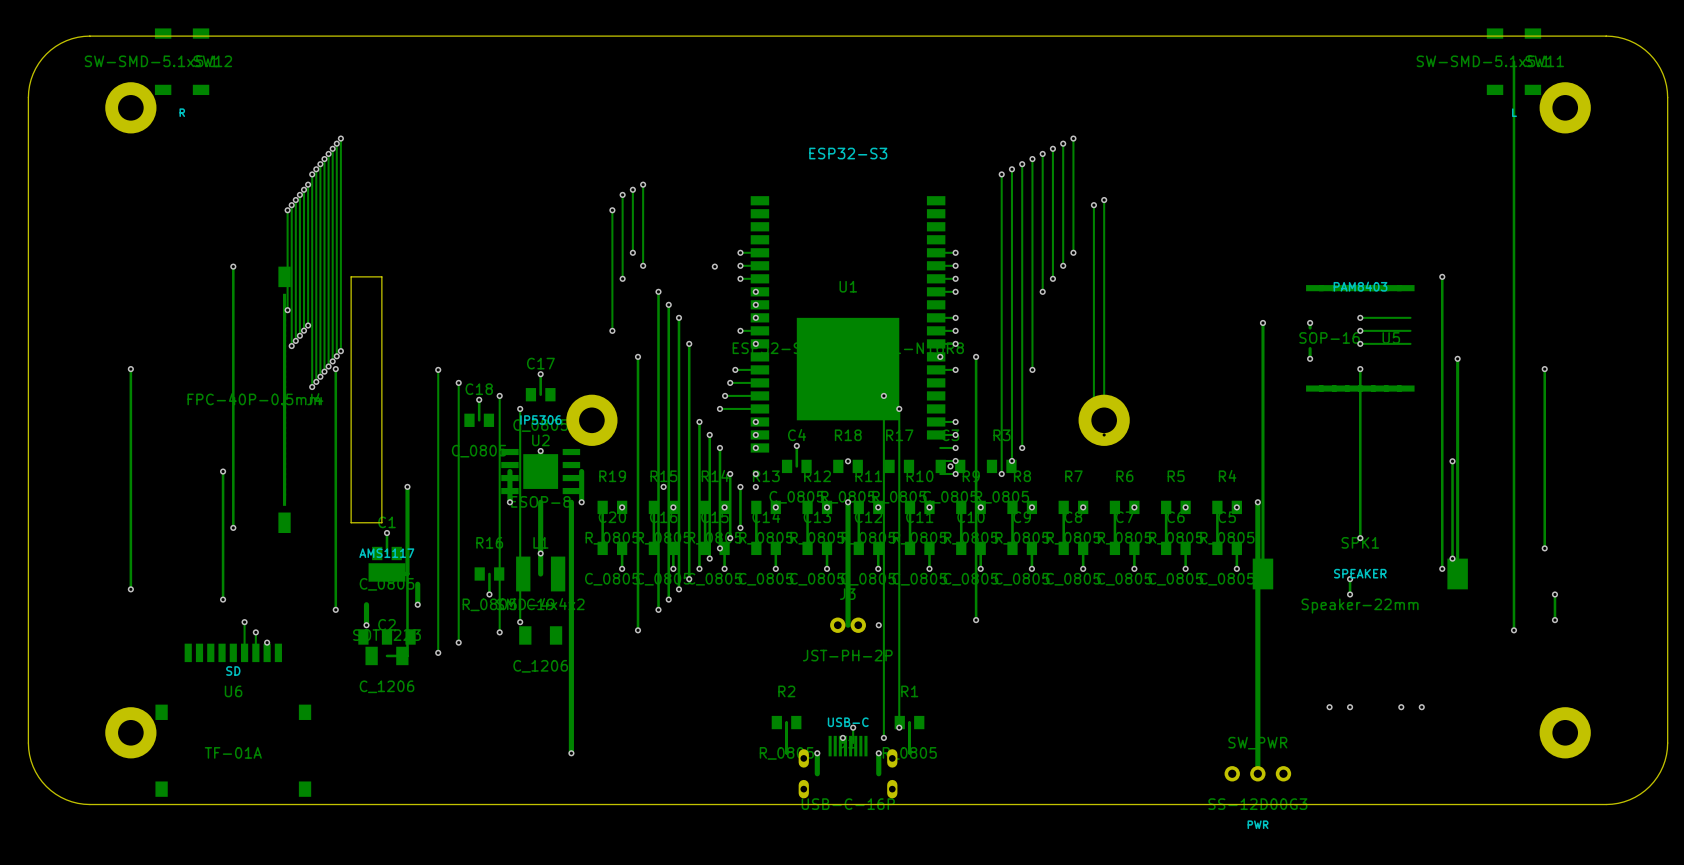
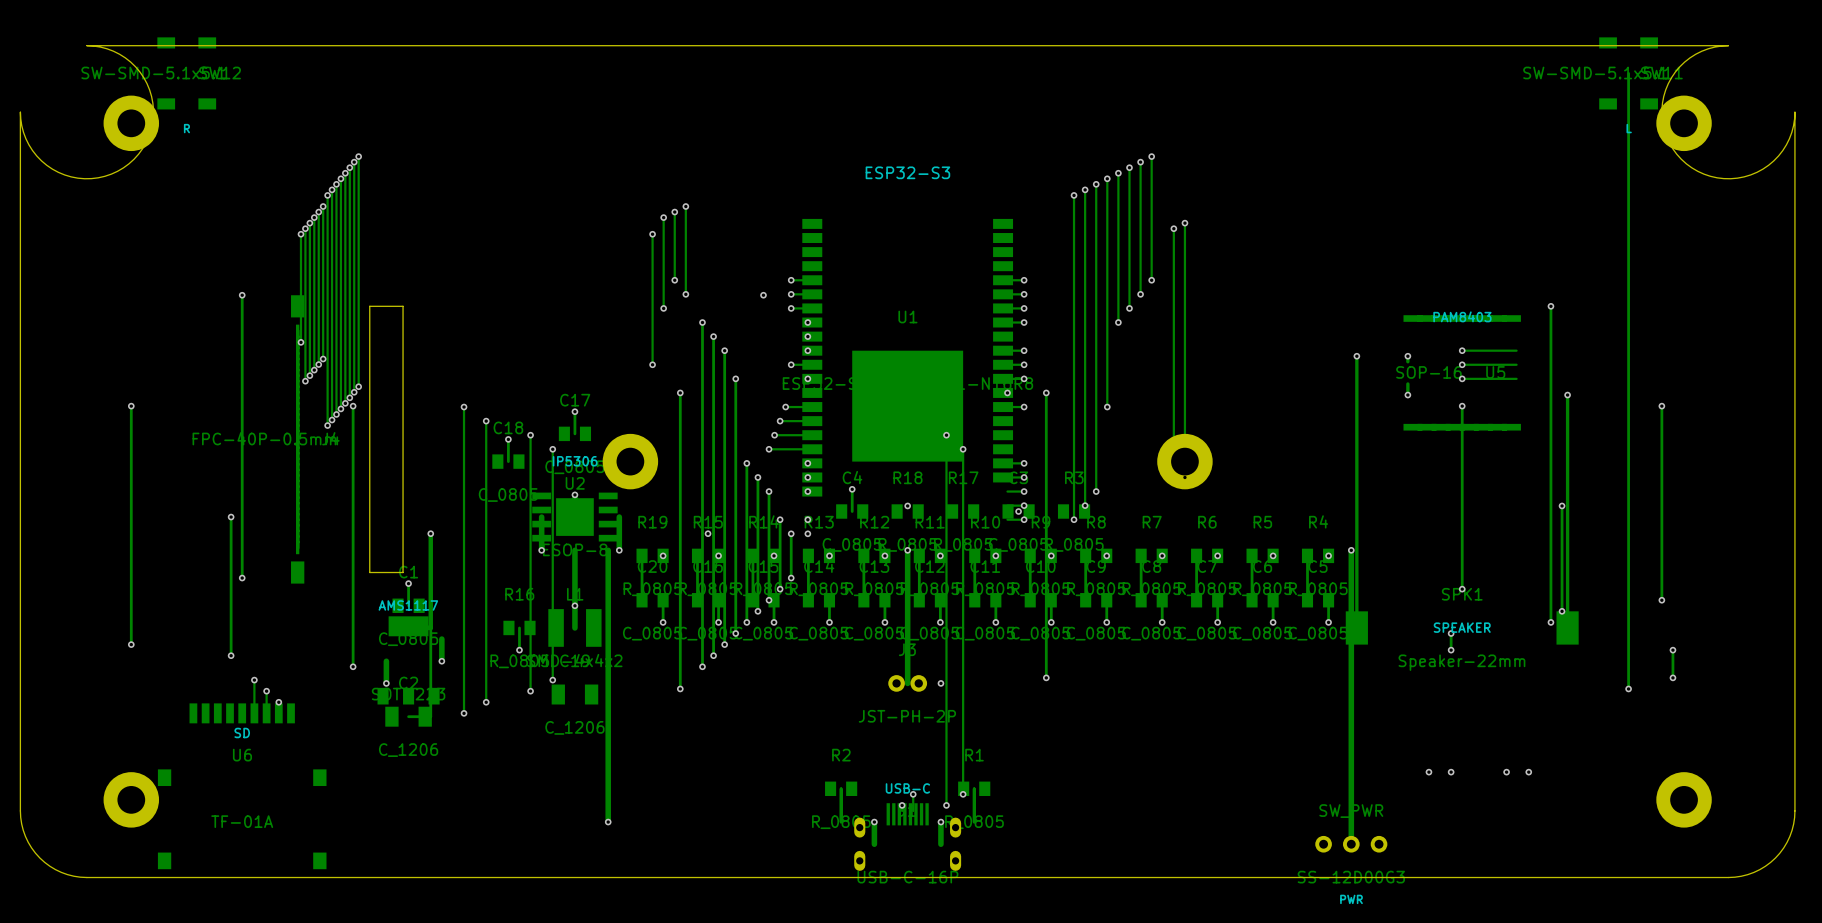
board edge: (89, 36) (66, 40) (46, 54) (33, 74) (28, 97) -> (86, 45) (107, 48) (125, 57) (139, 72) (149, 89) (153, 109) (151, 130) (146, 142) (133, 159) (117, 171) (98, 177) (77, 178) (58, 172) (41, 160) (32, 150) (23, 132) (20, 112)
board edge: (1606, 36) (1629, 40) (1649, 54) (1662, 74) (1667, 97) -> (1728, 45) (1708, 48) (1690, 57) (1675, 72) (1665, 89) (1662, 103) (1662, 123) (1669, 142) (1681, 159) (1697, 171) (1717, 177) (1737, 178) (1750, 174) (1768, 165) (1782, 150) (1791, 132) (1794, 112)

